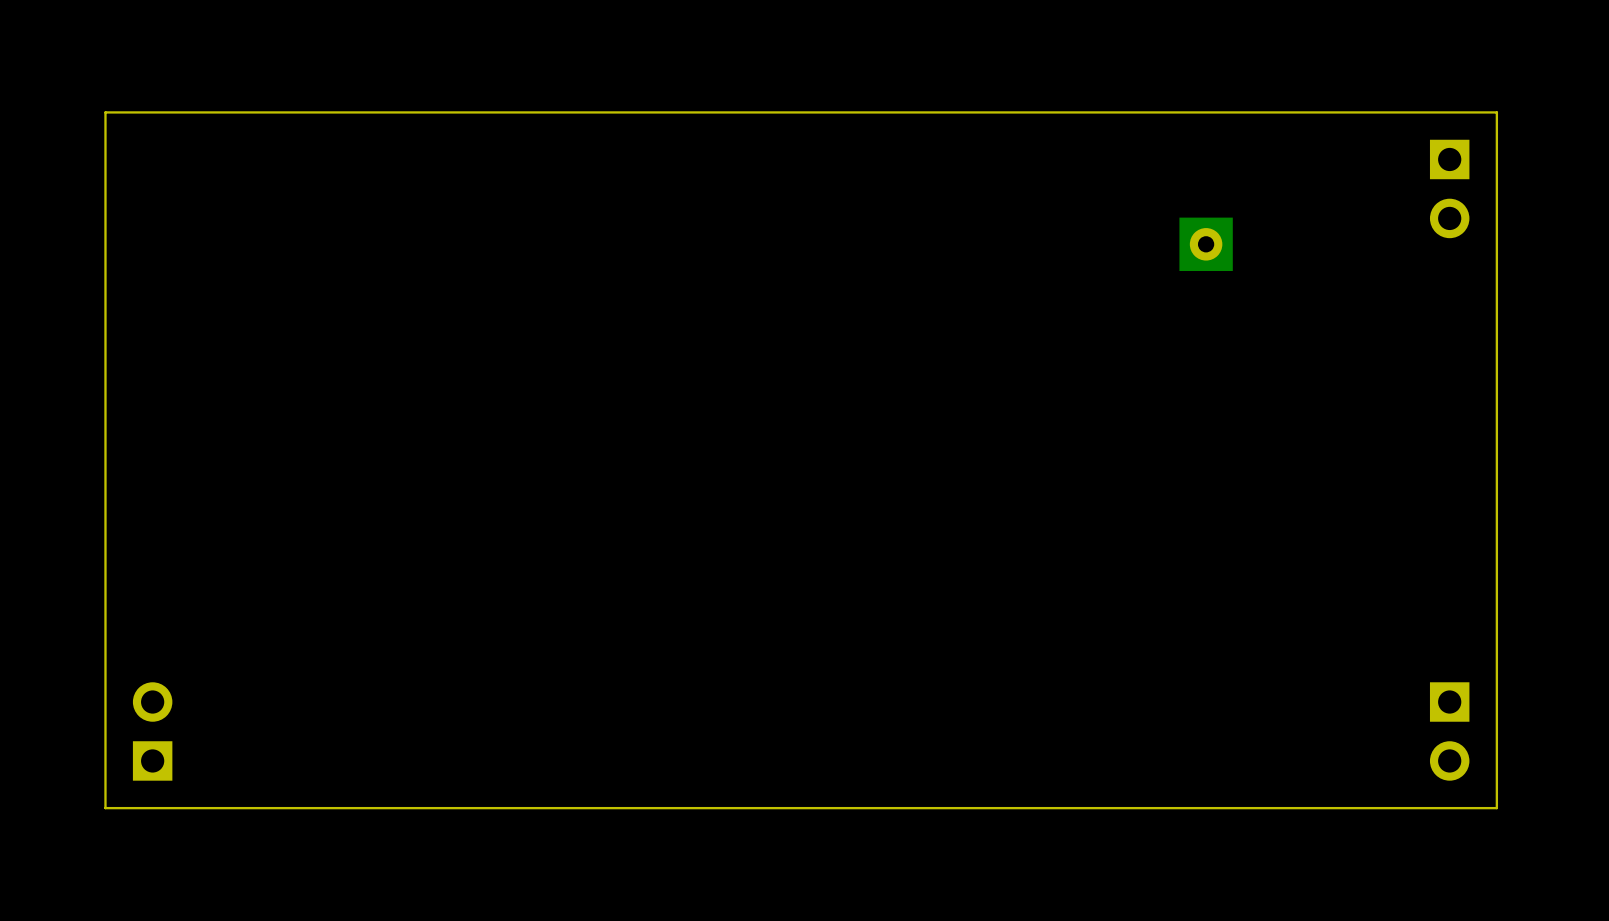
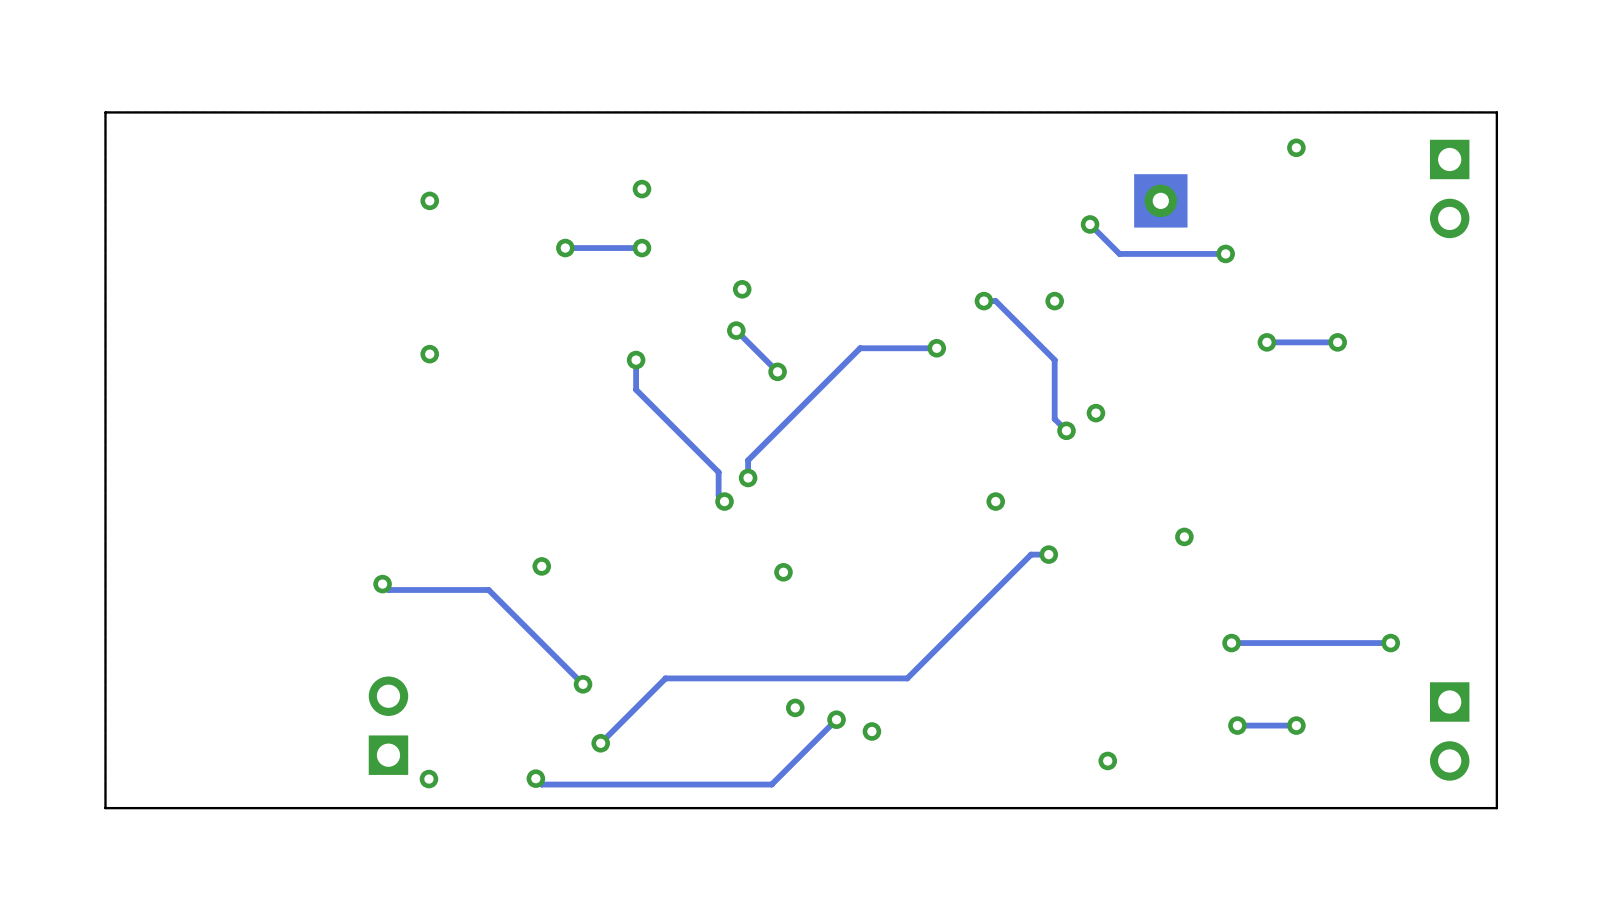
via: none -> (1296, 147)
via: none -> (641, 189)
via: none -> (429, 200)
track: none -> (1090, 224) (1119, 253) (1225, 253)
via: none -> (1090, 224)
part position: (1206, 244) -> (1160, 200)
via: none -> (565, 248)
track: none -> (641, 248) (565, 248)
via: none -> (641, 248)
via: none -> (1225, 253)
via: none -> (742, 289)
track: none -> (983, 301) (995, 301) (1054, 360) (1054, 419) (1066, 430)
via: none -> (983, 301)
via: none -> (1054, 301)
track: none -> (736, 330) (777, 371)
via: none -> (736, 330)
via: none -> (1266, 342)
track: none -> (1337, 342) (1266, 342)
via: none -> (1337, 342)
track: none -> (936, 348) (860, 348) (748, 460) (748, 477)
via: none -> (936, 348)
via: none -> (429, 354)
track: none -> (636, 360) (636, 389) (718, 472) (718, 495) (724, 501)
via: none -> (636, 360)
via: none -> (777, 371)
via: none -> (1095, 413)
via: none -> (1066, 430)
via: none -> (748, 477)
via: none -> (724, 501)
via: none -> (995, 501)
via: none -> (1184, 536)
track: none -> (1048, 554) (1031, 554) (907, 678) (665, 678) (600, 743)
via: none -> (1048, 554)
via: none -> (541, 566)
via: none -> (783, 572)
track: none -> (382, 584) (388, 589) (488, 589) (583, 684)
via: none -> (382, 584)
via: none -> (1231, 643)
track: none -> (1390, 643) (1231, 643)
via: none -> (1390, 643)
via: none -> (583, 684)
via: none -> (795, 707)
track: none -> (836, 719) (771, 784) (541, 784) (535, 778)
via: none -> (836, 719)
via: none -> (1237, 725)
track: none -> (1296, 725) (1237, 725)
via: none -> (1296, 725)
part position: (152, 731) -> (388, 725)
via: none -> (871, 731)
via: none -> (600, 743)
via: none -> (1107, 760)
via: none -> (535, 778)
via: none -> (428, 779)

